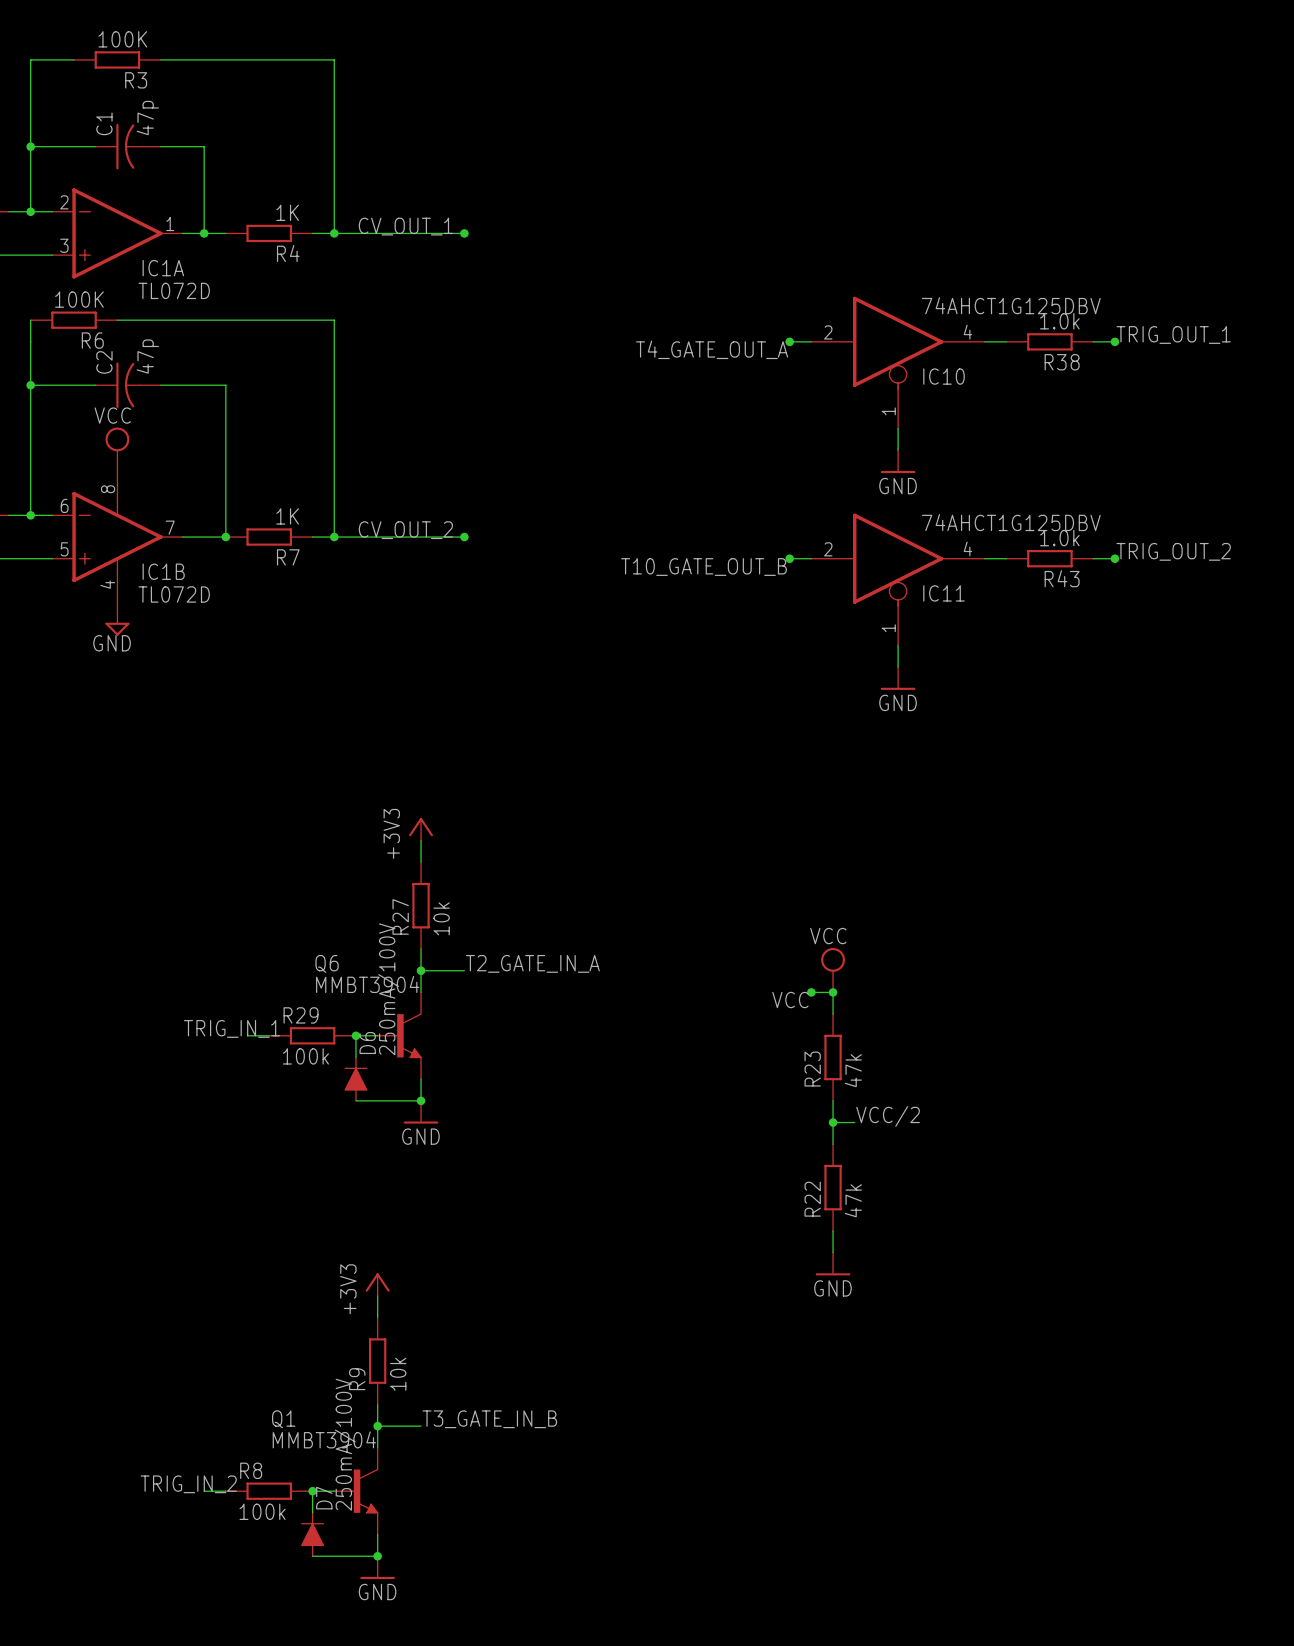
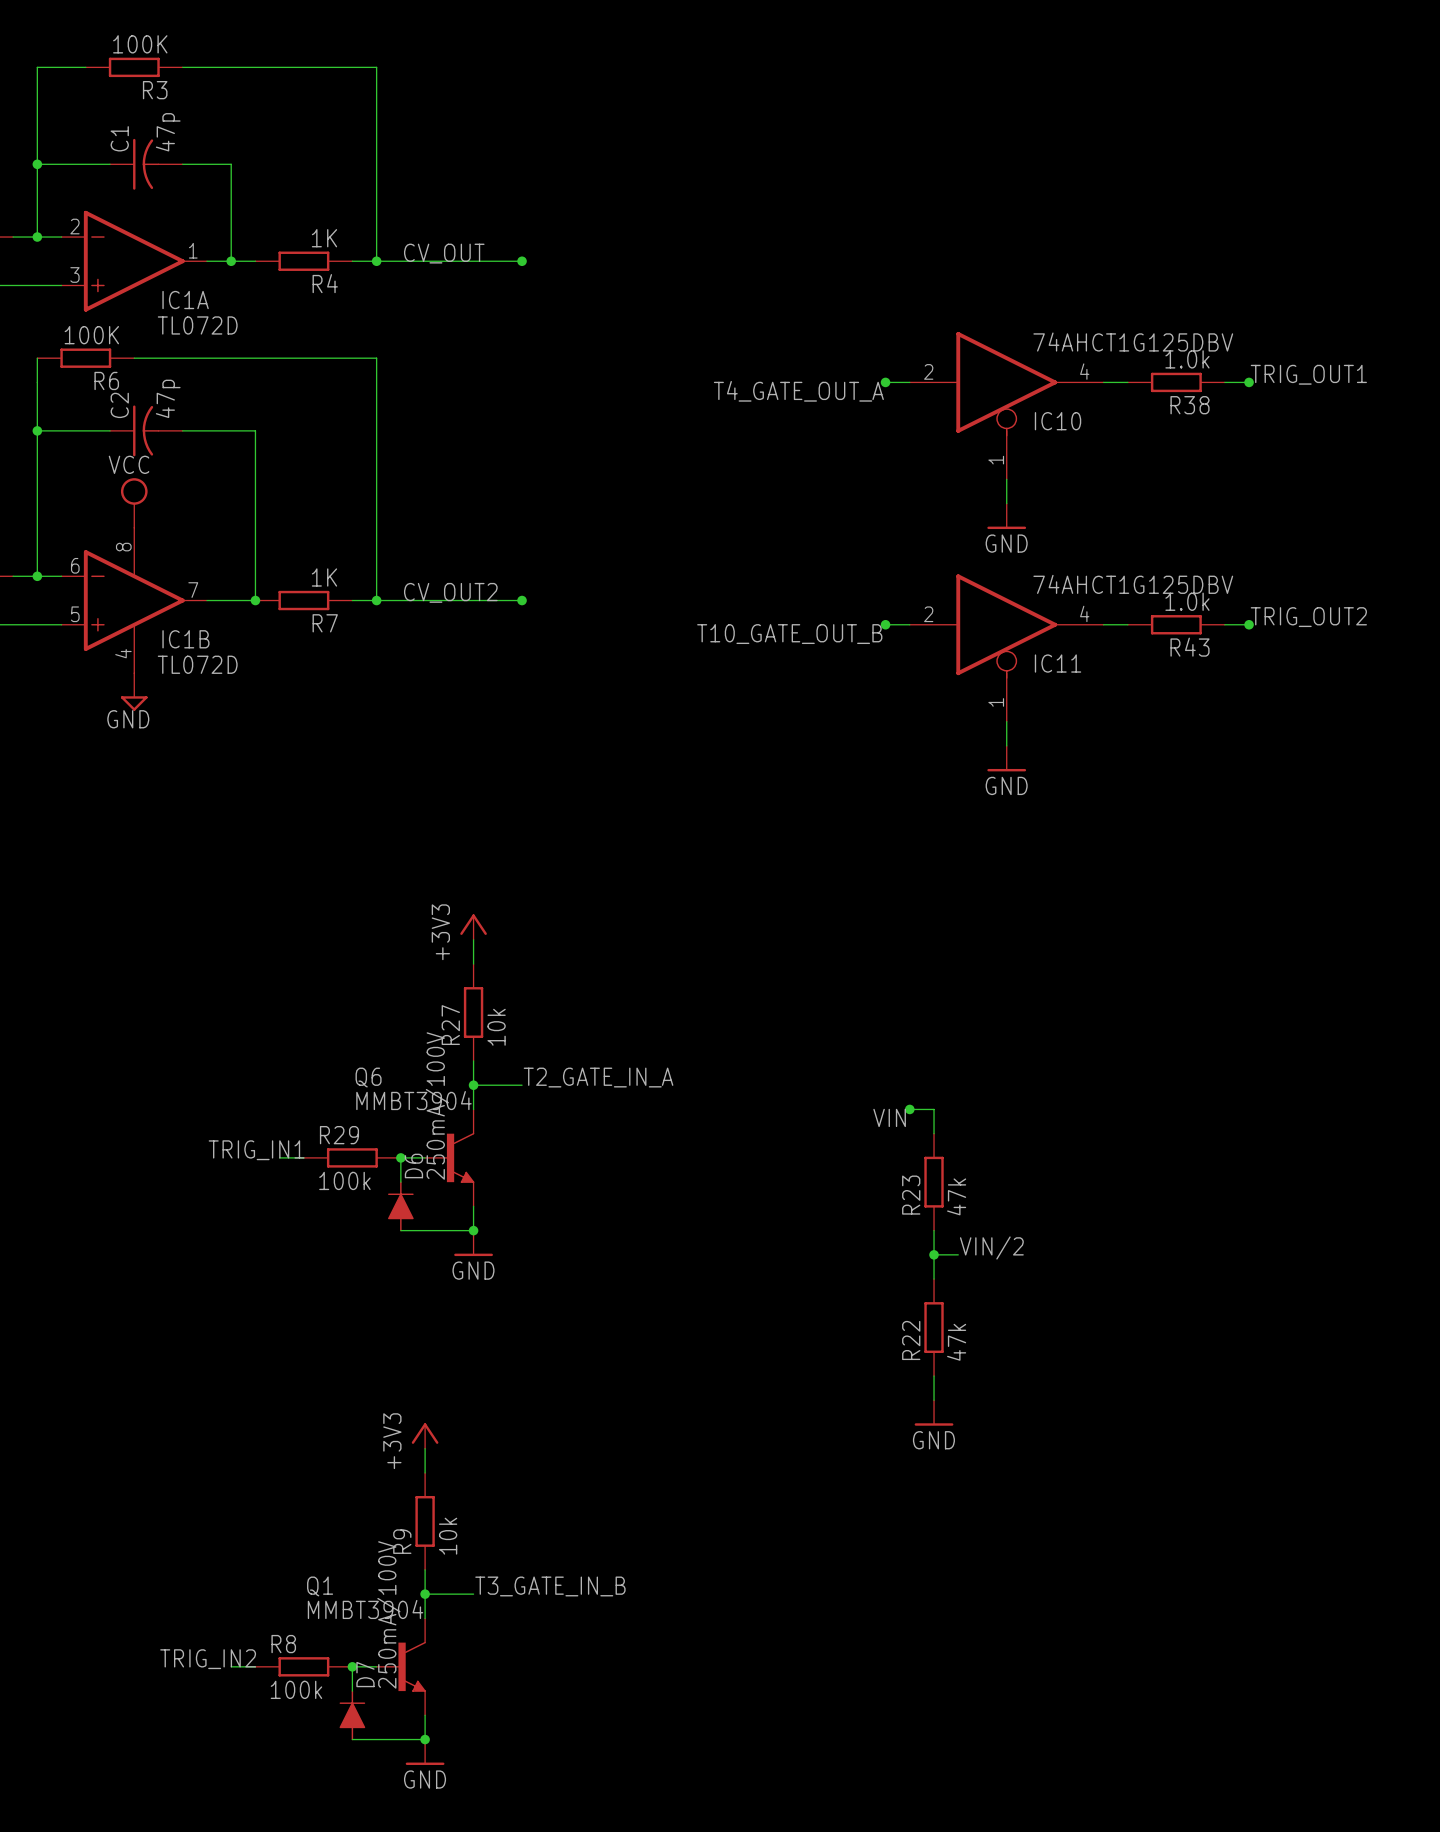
label: CV_OUT_1 (405, 226) -> CV_OUT (444, 253)
label: TRIG_OUT_1 (1173, 334) -> TRIG_OUT1 (1308, 374)
label: CV_OUT_2 (405, 530) -> CV_OUT2 (450, 592)
label: TRIG_OUT_2 (1173, 551) -> TRIG_OUT2 (1308, 617)
power symbol: VCC (833, 970) -> none
junction: (833, 992) -> none
label: VCC (790, 1000) -> VIN (889, 1117)
label: TRIG_IN_1 (232, 1028) -> TRIG_IN1 (256, 1150)
label: VCC/2 (888, 1116) -> VIN/2 (991, 1247)
label: TRIG_IN_2 (188, 1484) -> TRIG_IN2 (208, 1659)

